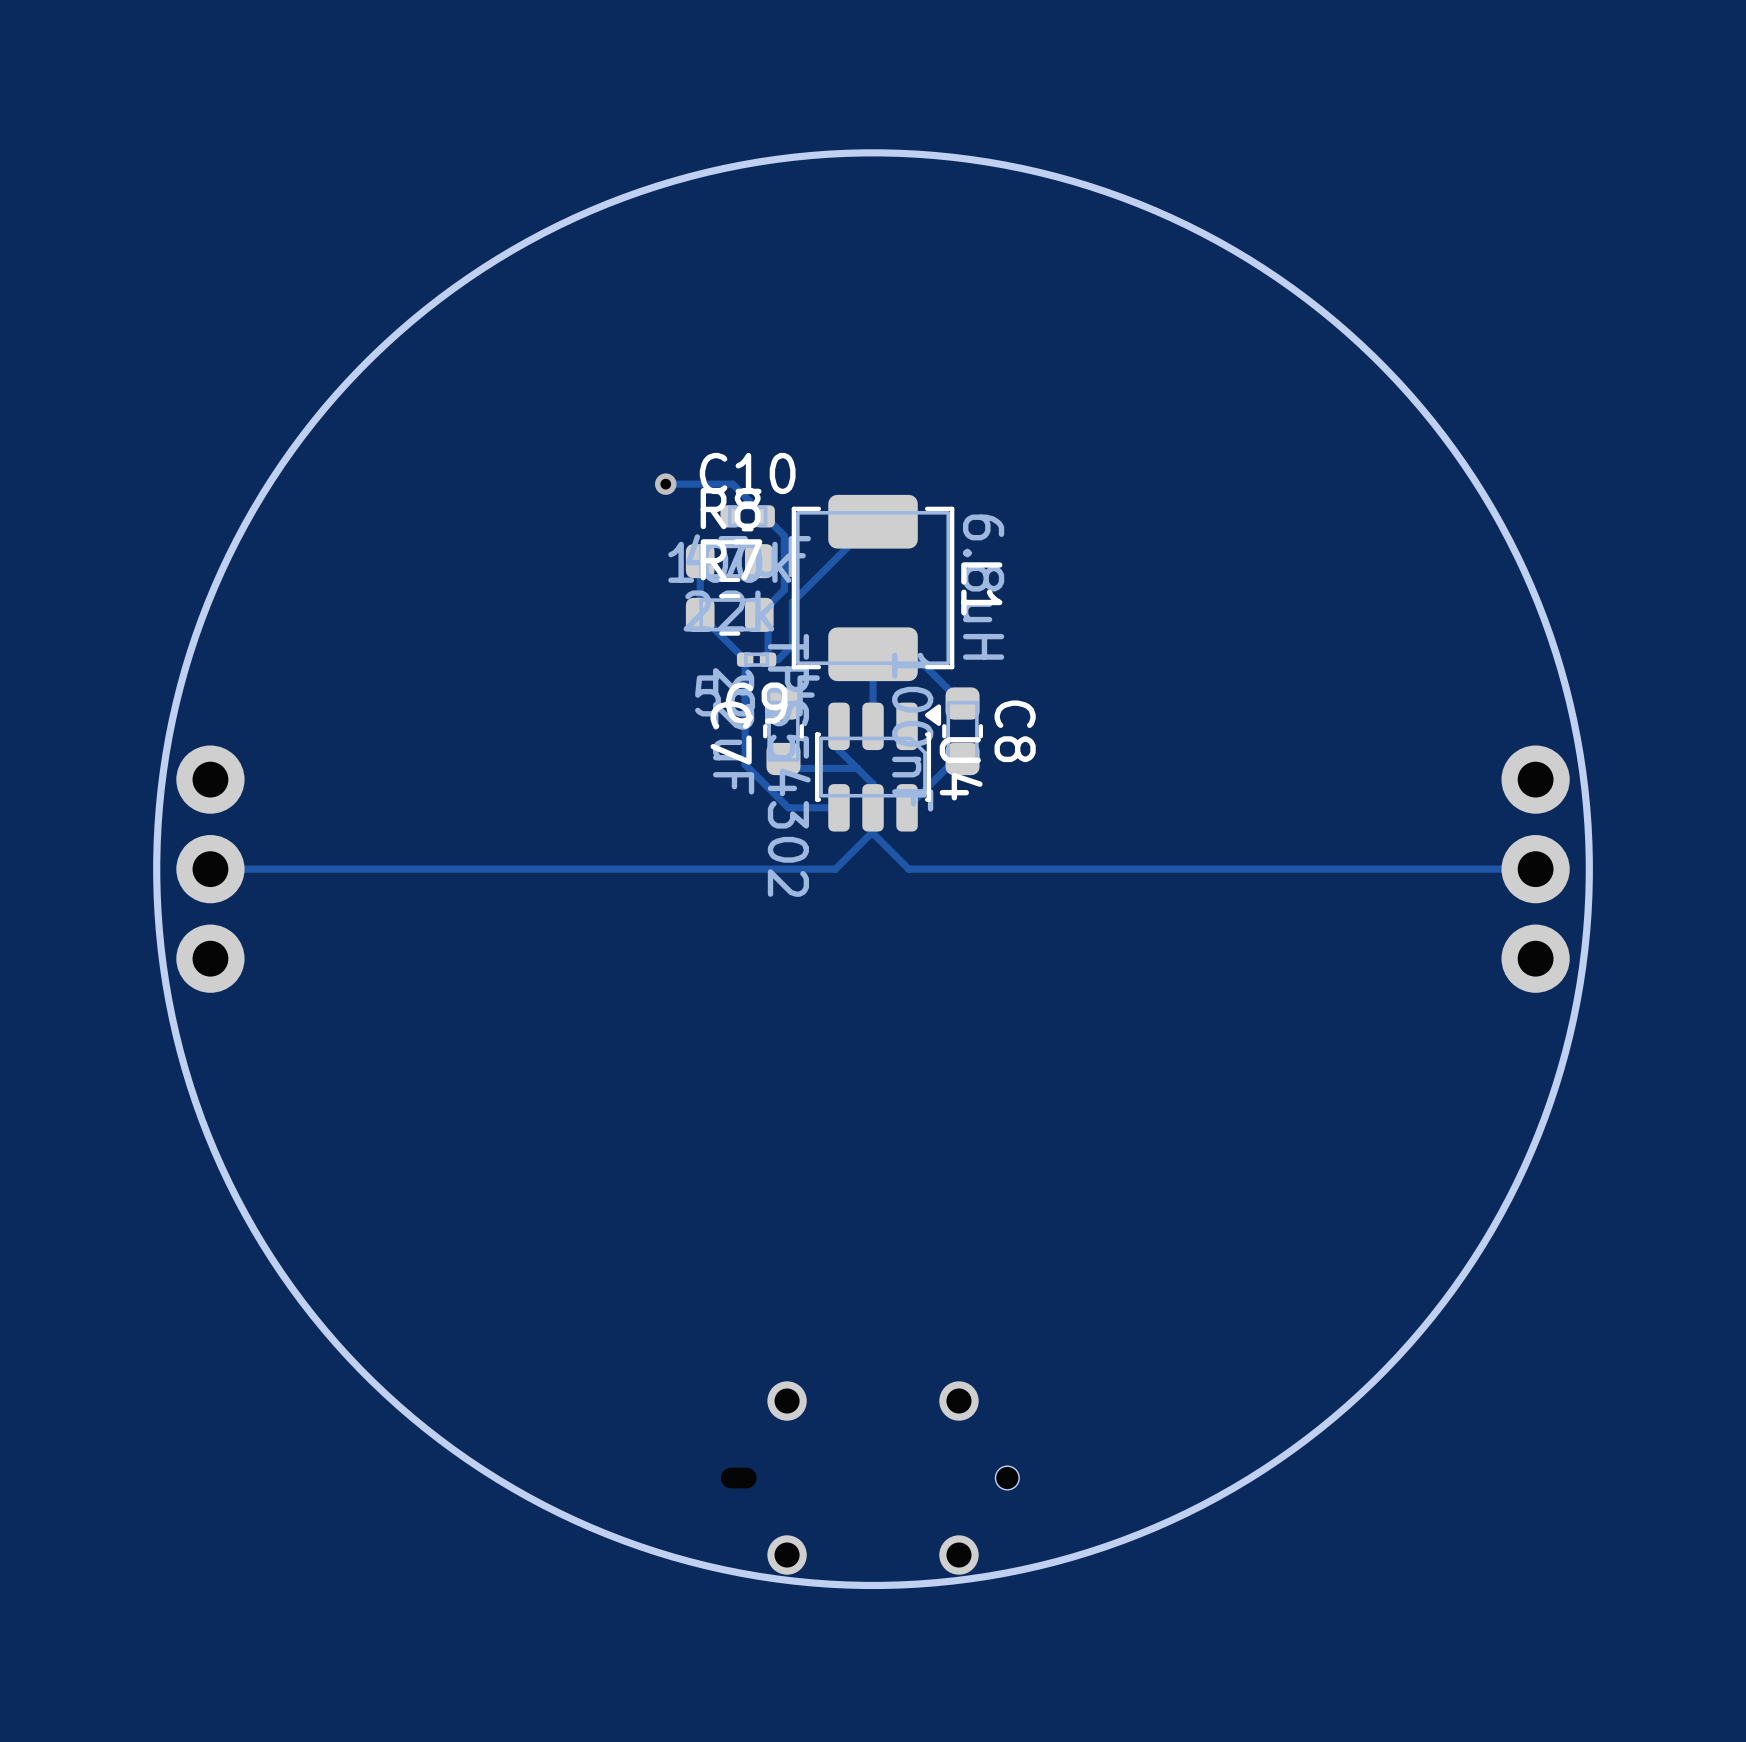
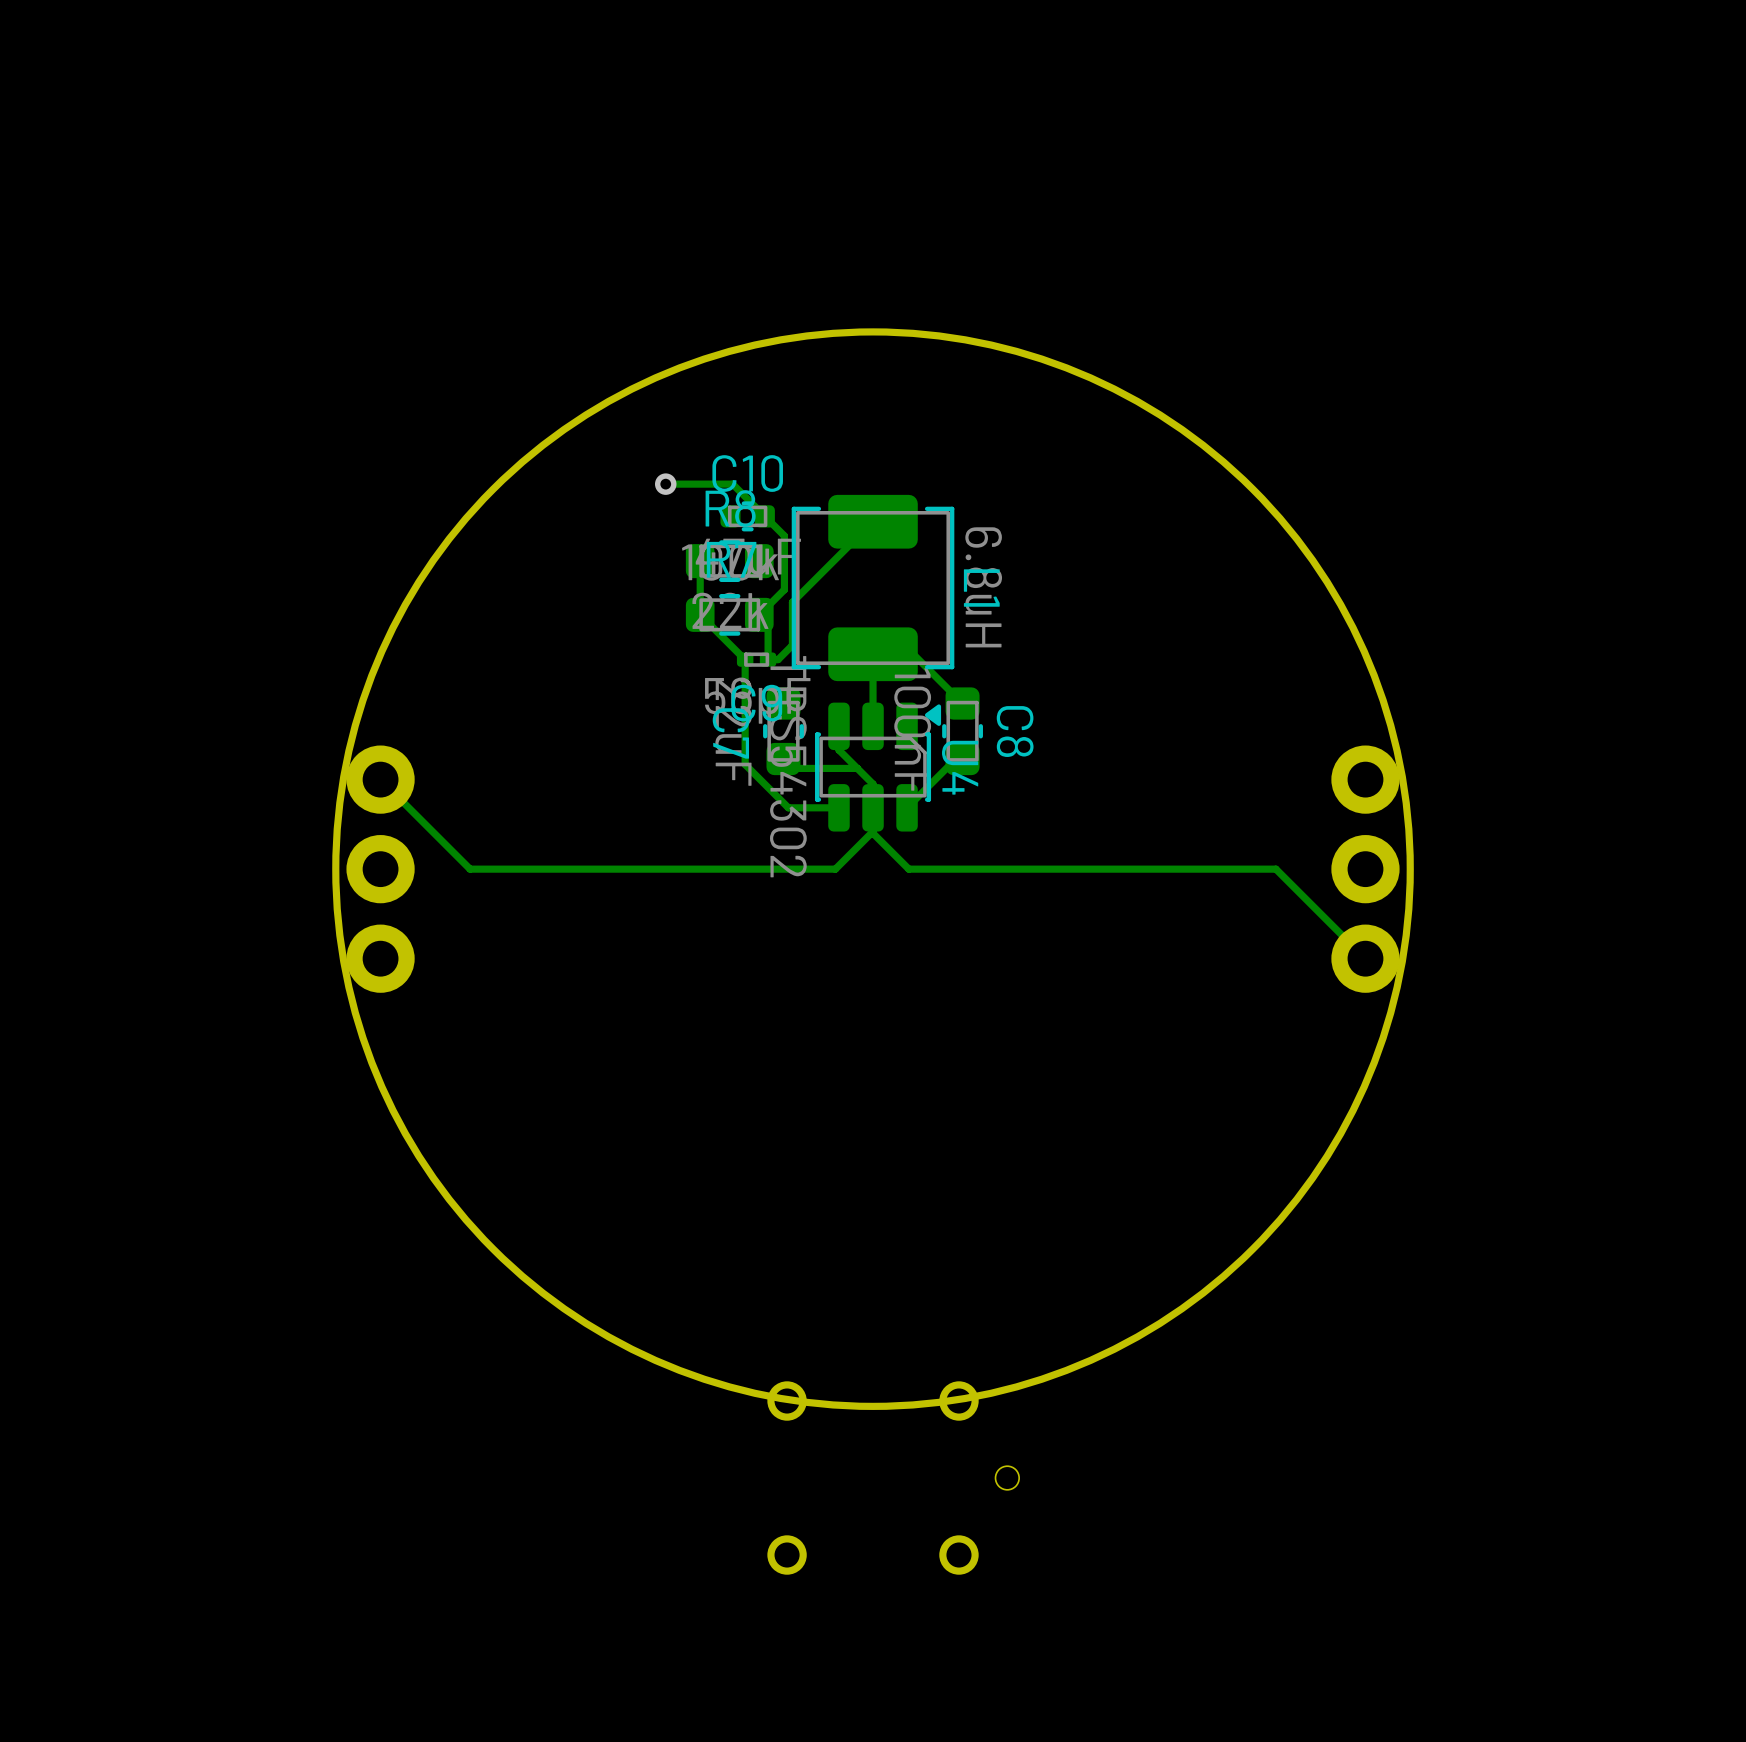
round board edge size: [153, 149, 1593, 1590] -> [332, 328, 1414, 1410]
part position: (210, 869) -> (380, 869)
track: (470, 869) (210, 869) -> (470, 869) (380, 779)
track: (1535, 869) (1275, 869) -> (1365, 958) (1275, 869)
part position: (1535, 869) -> (1365, 869)

